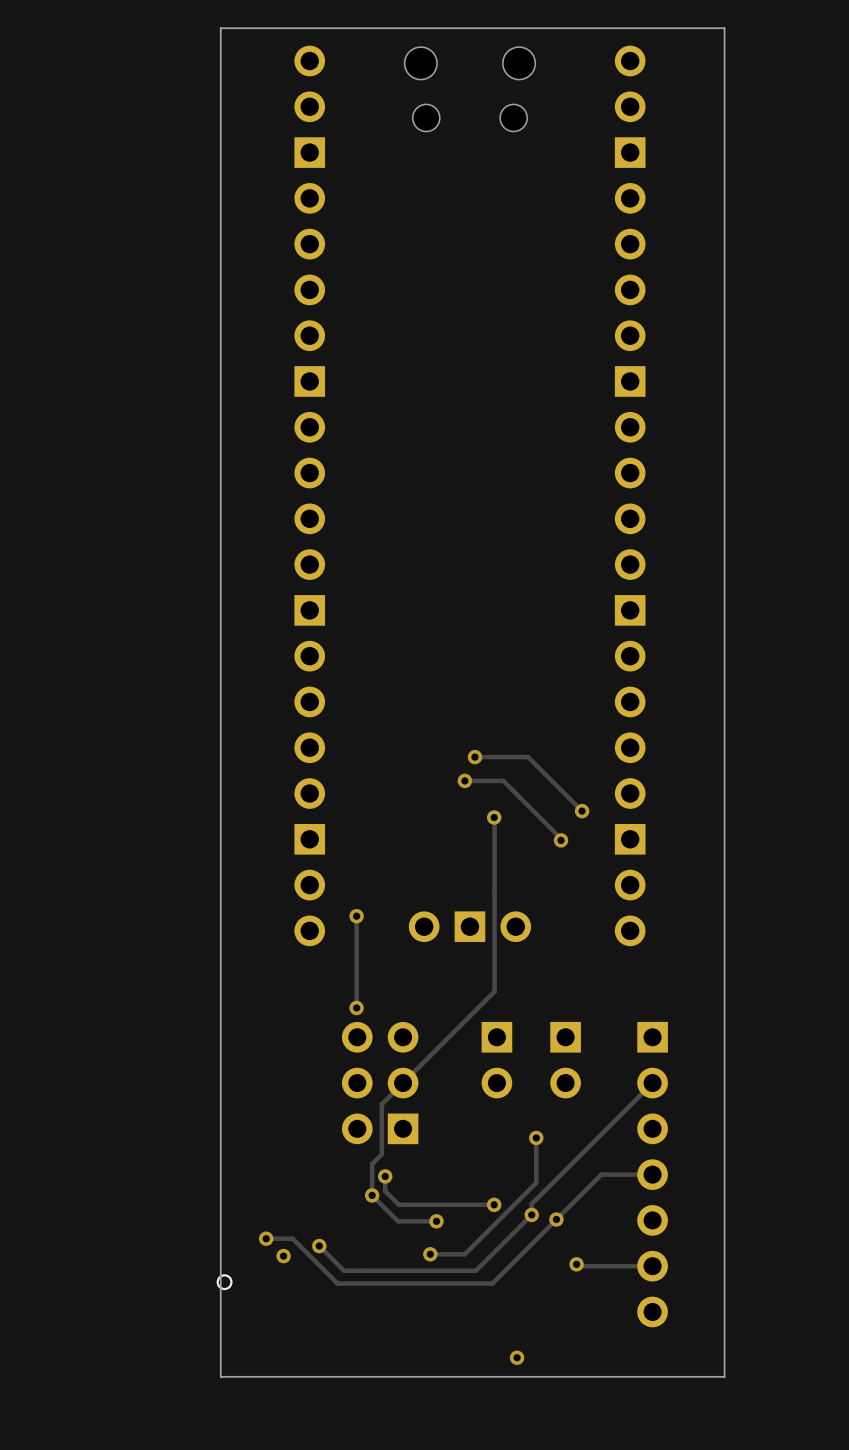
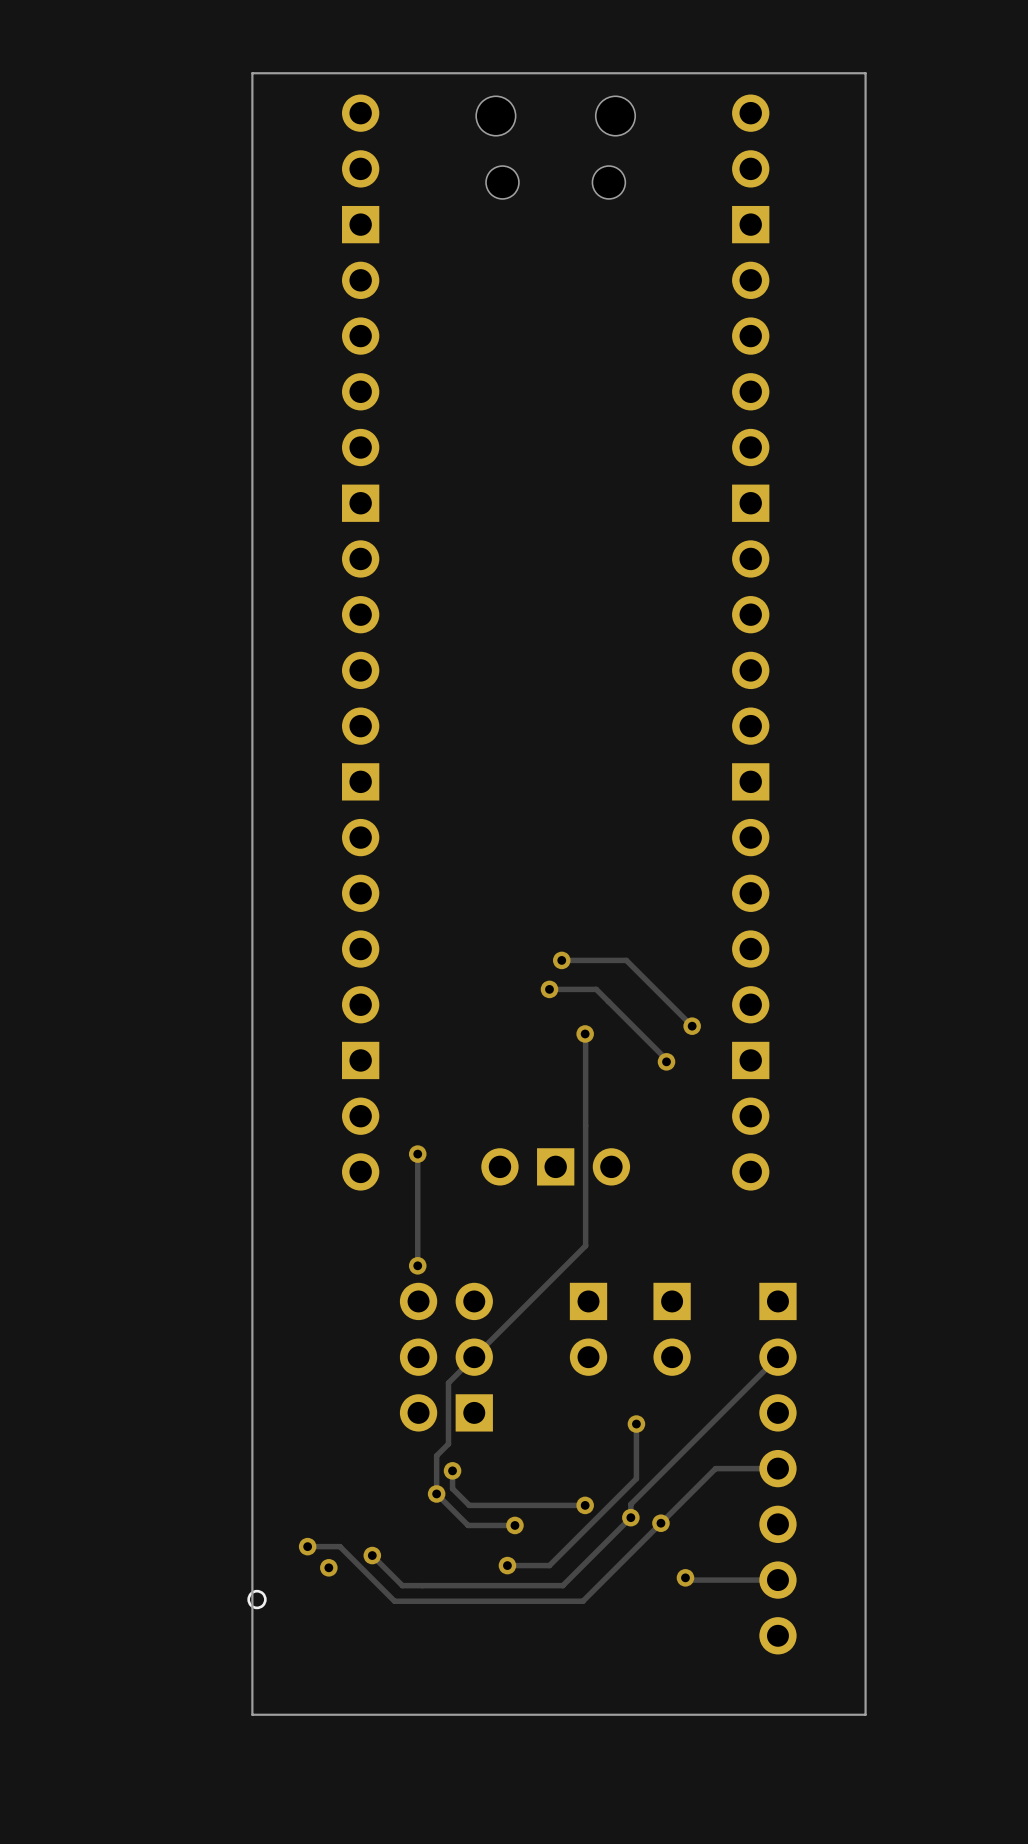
via: (517, 1357) -> none

